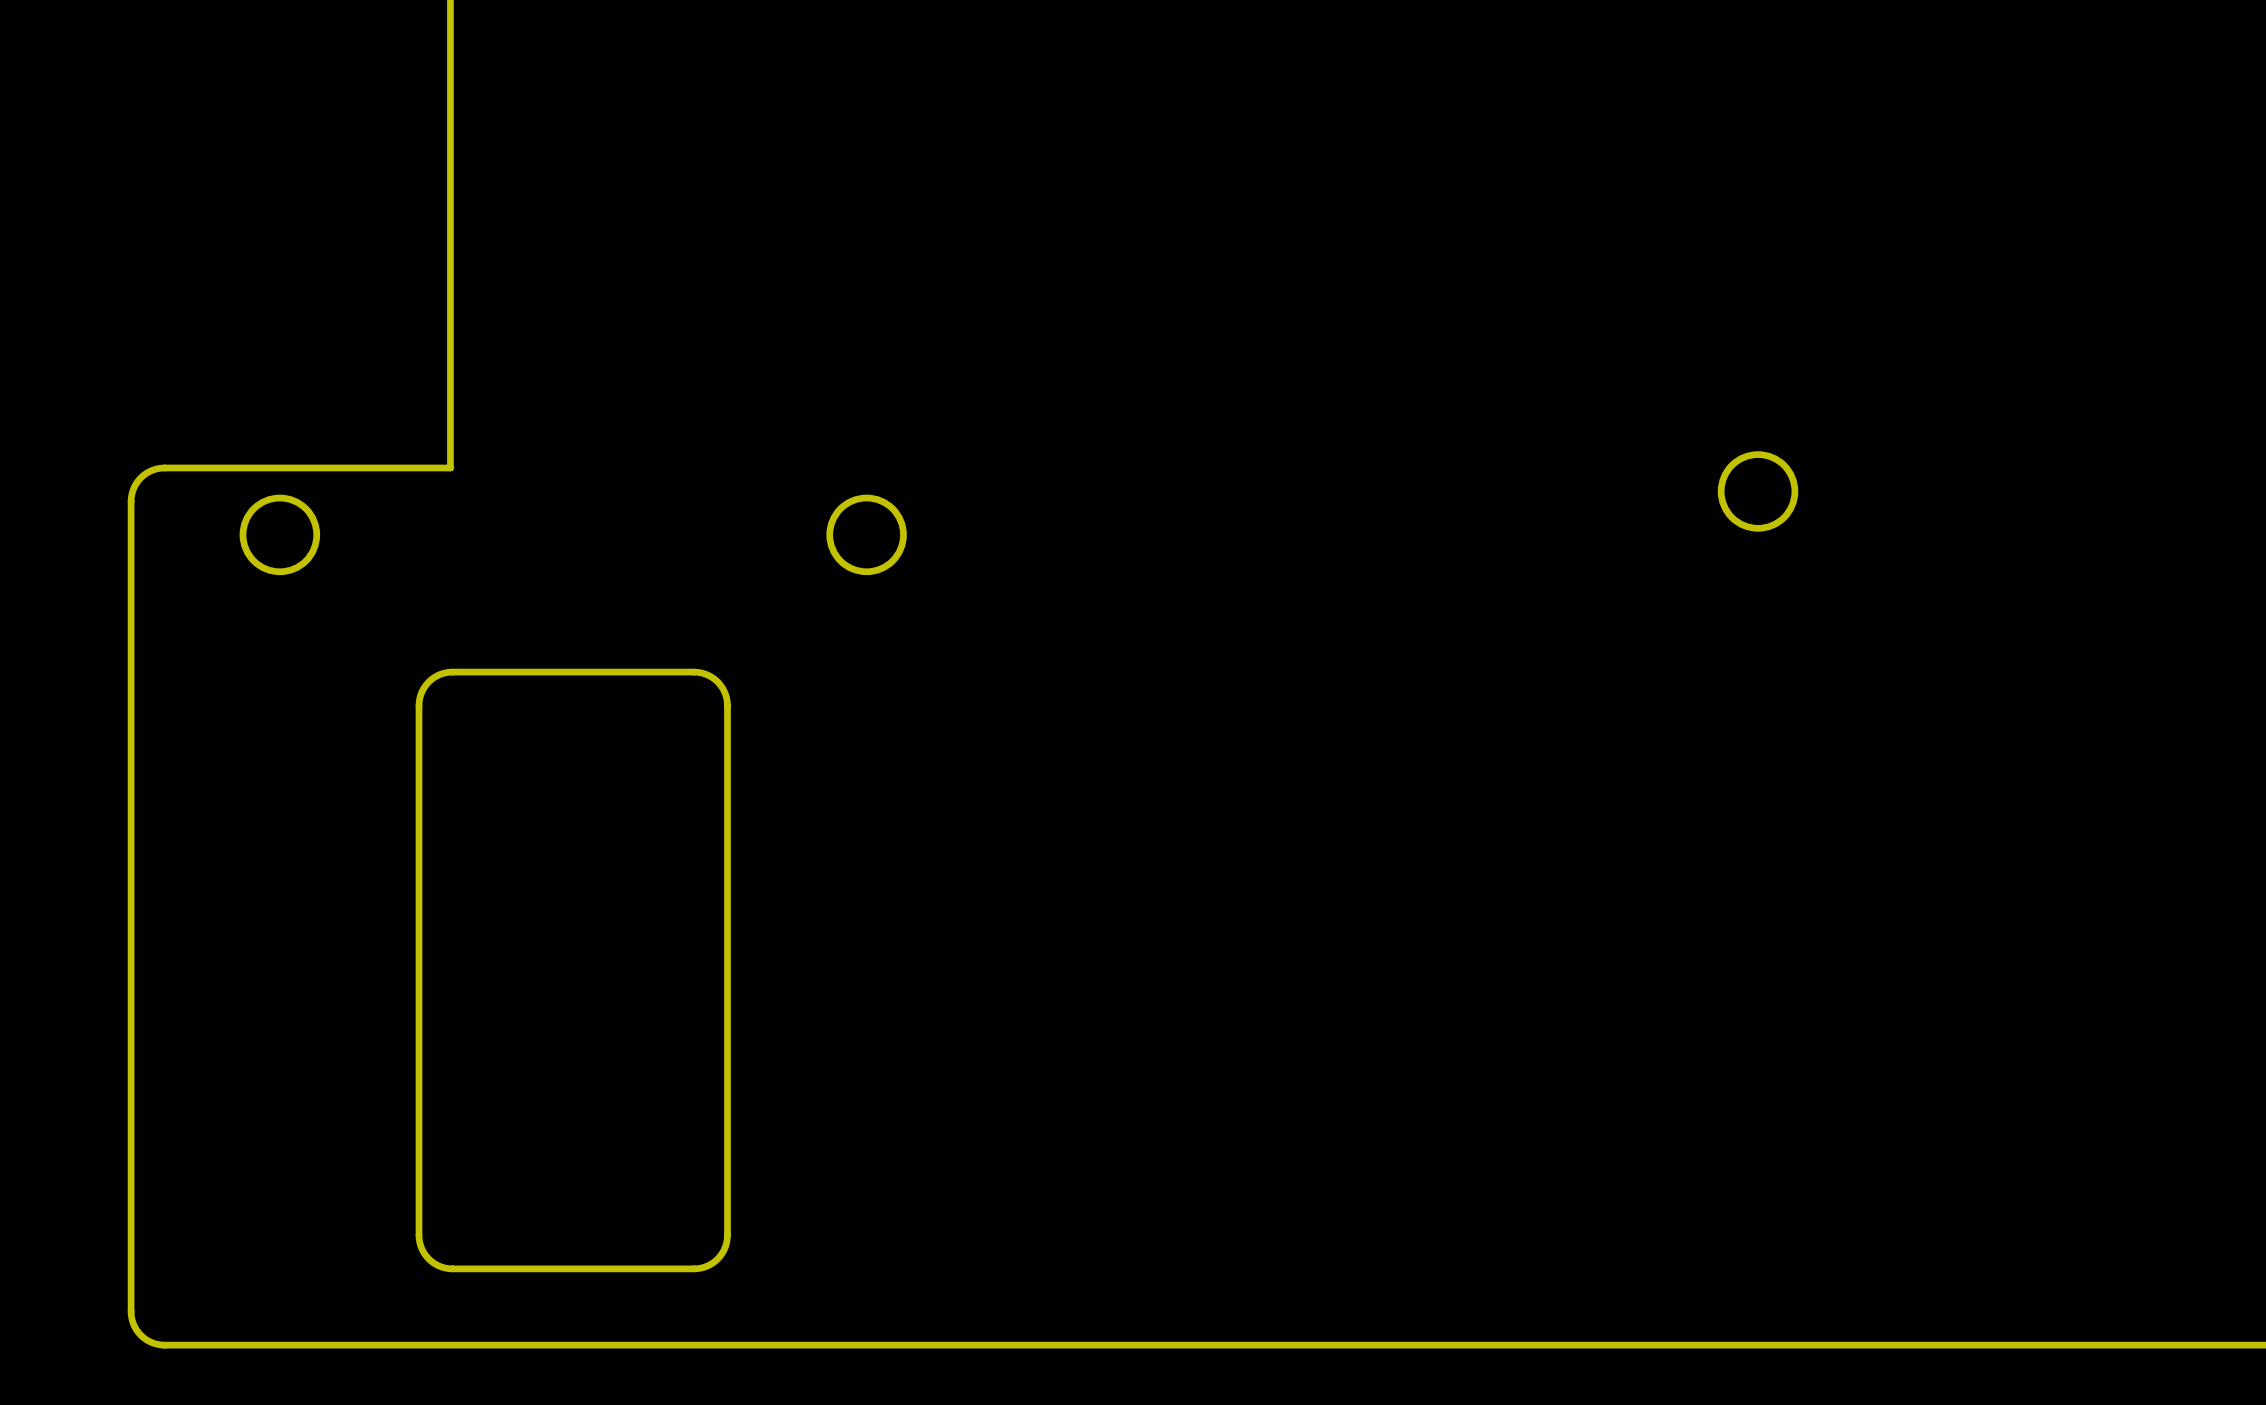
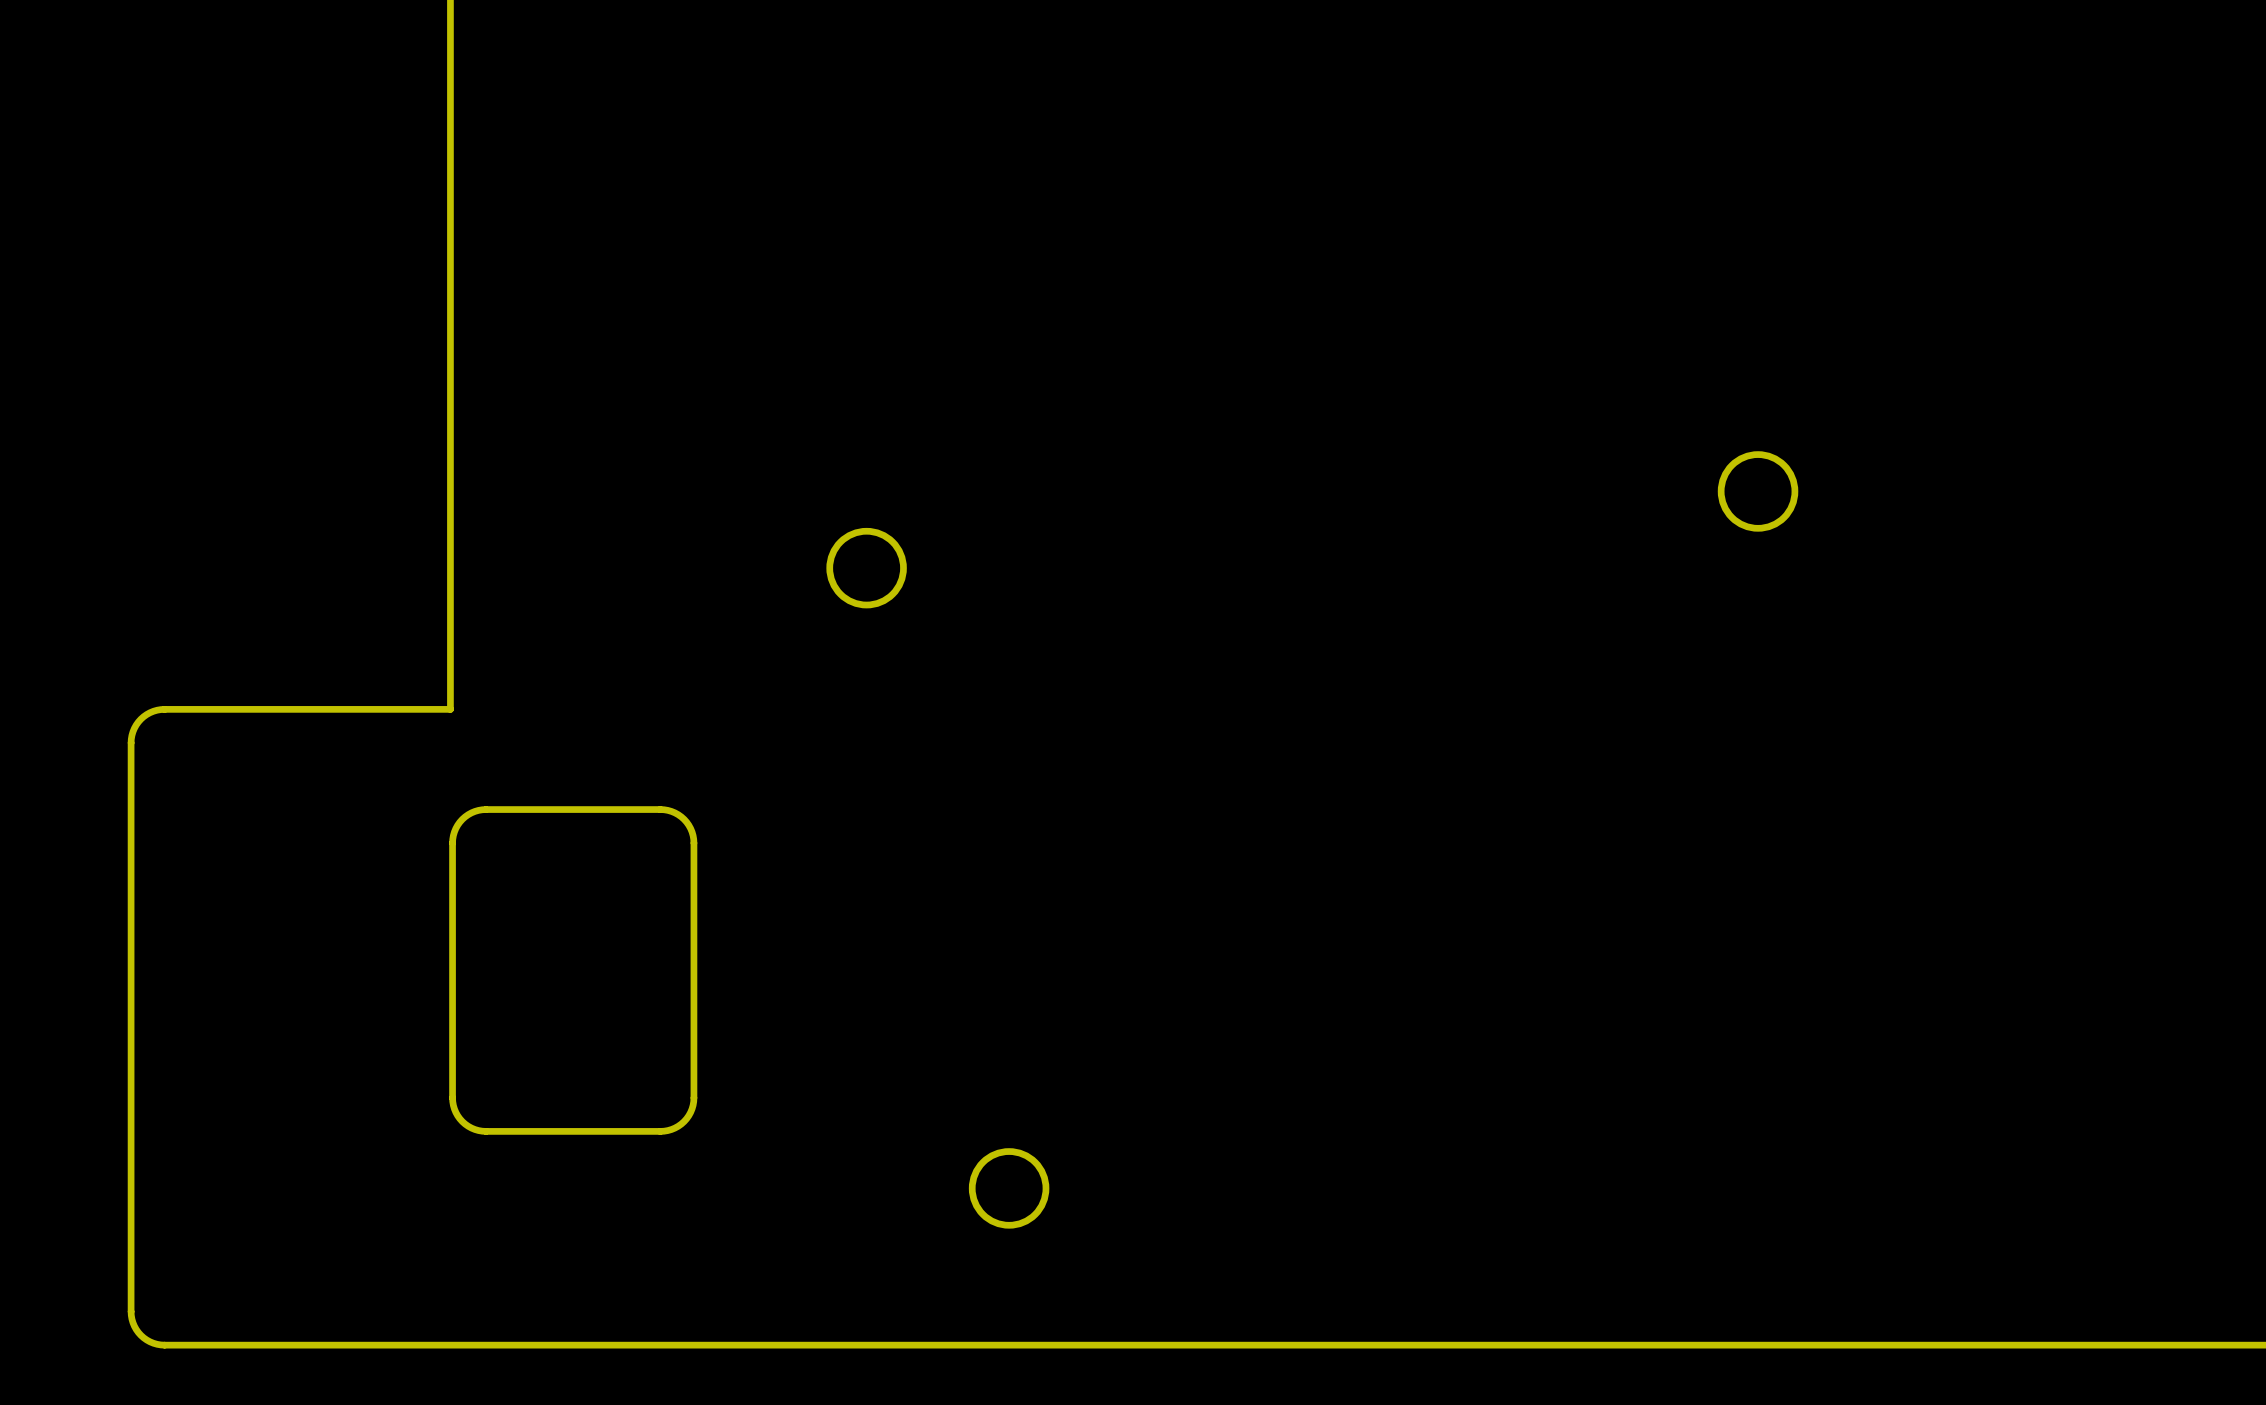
board edge: (450, 467) (164, 467) (153, 469) (143, 475) (134, 486) (131, 501) (131, 742) -> (450, 467) (450, 709) (160, 709) (150, 712) (138, 722) (132, 731) (131, 742)
round board edge: [239, 494, 321, 576] -> none
round board edge position: (866, 534) -> (866, 568)
board edge: (452, 672) (697, 672) (711, 677) (724, 691) (727, 705) (727, 1235) (722, 1253) (708, 1265) (693, 1268) (452, 1268) (434, 1263) (422, 1249) (419, 1235) (419, 705) (420, 694) (428, 681) (441, 673) (452, 672) -> none
board edge: none -> (486, 809) (664, 809) (678, 814) (688, 825) (693, 843) (693, 1097) (688, 1115) (678, 1126) (660, 1131) (486, 1131) (468, 1126) (457, 1115) (452, 1097) (452, 839) (455, 828) (462, 819) (471, 812) (486, 809)
round board edge: none -> [968, 1148, 1050, 1229]

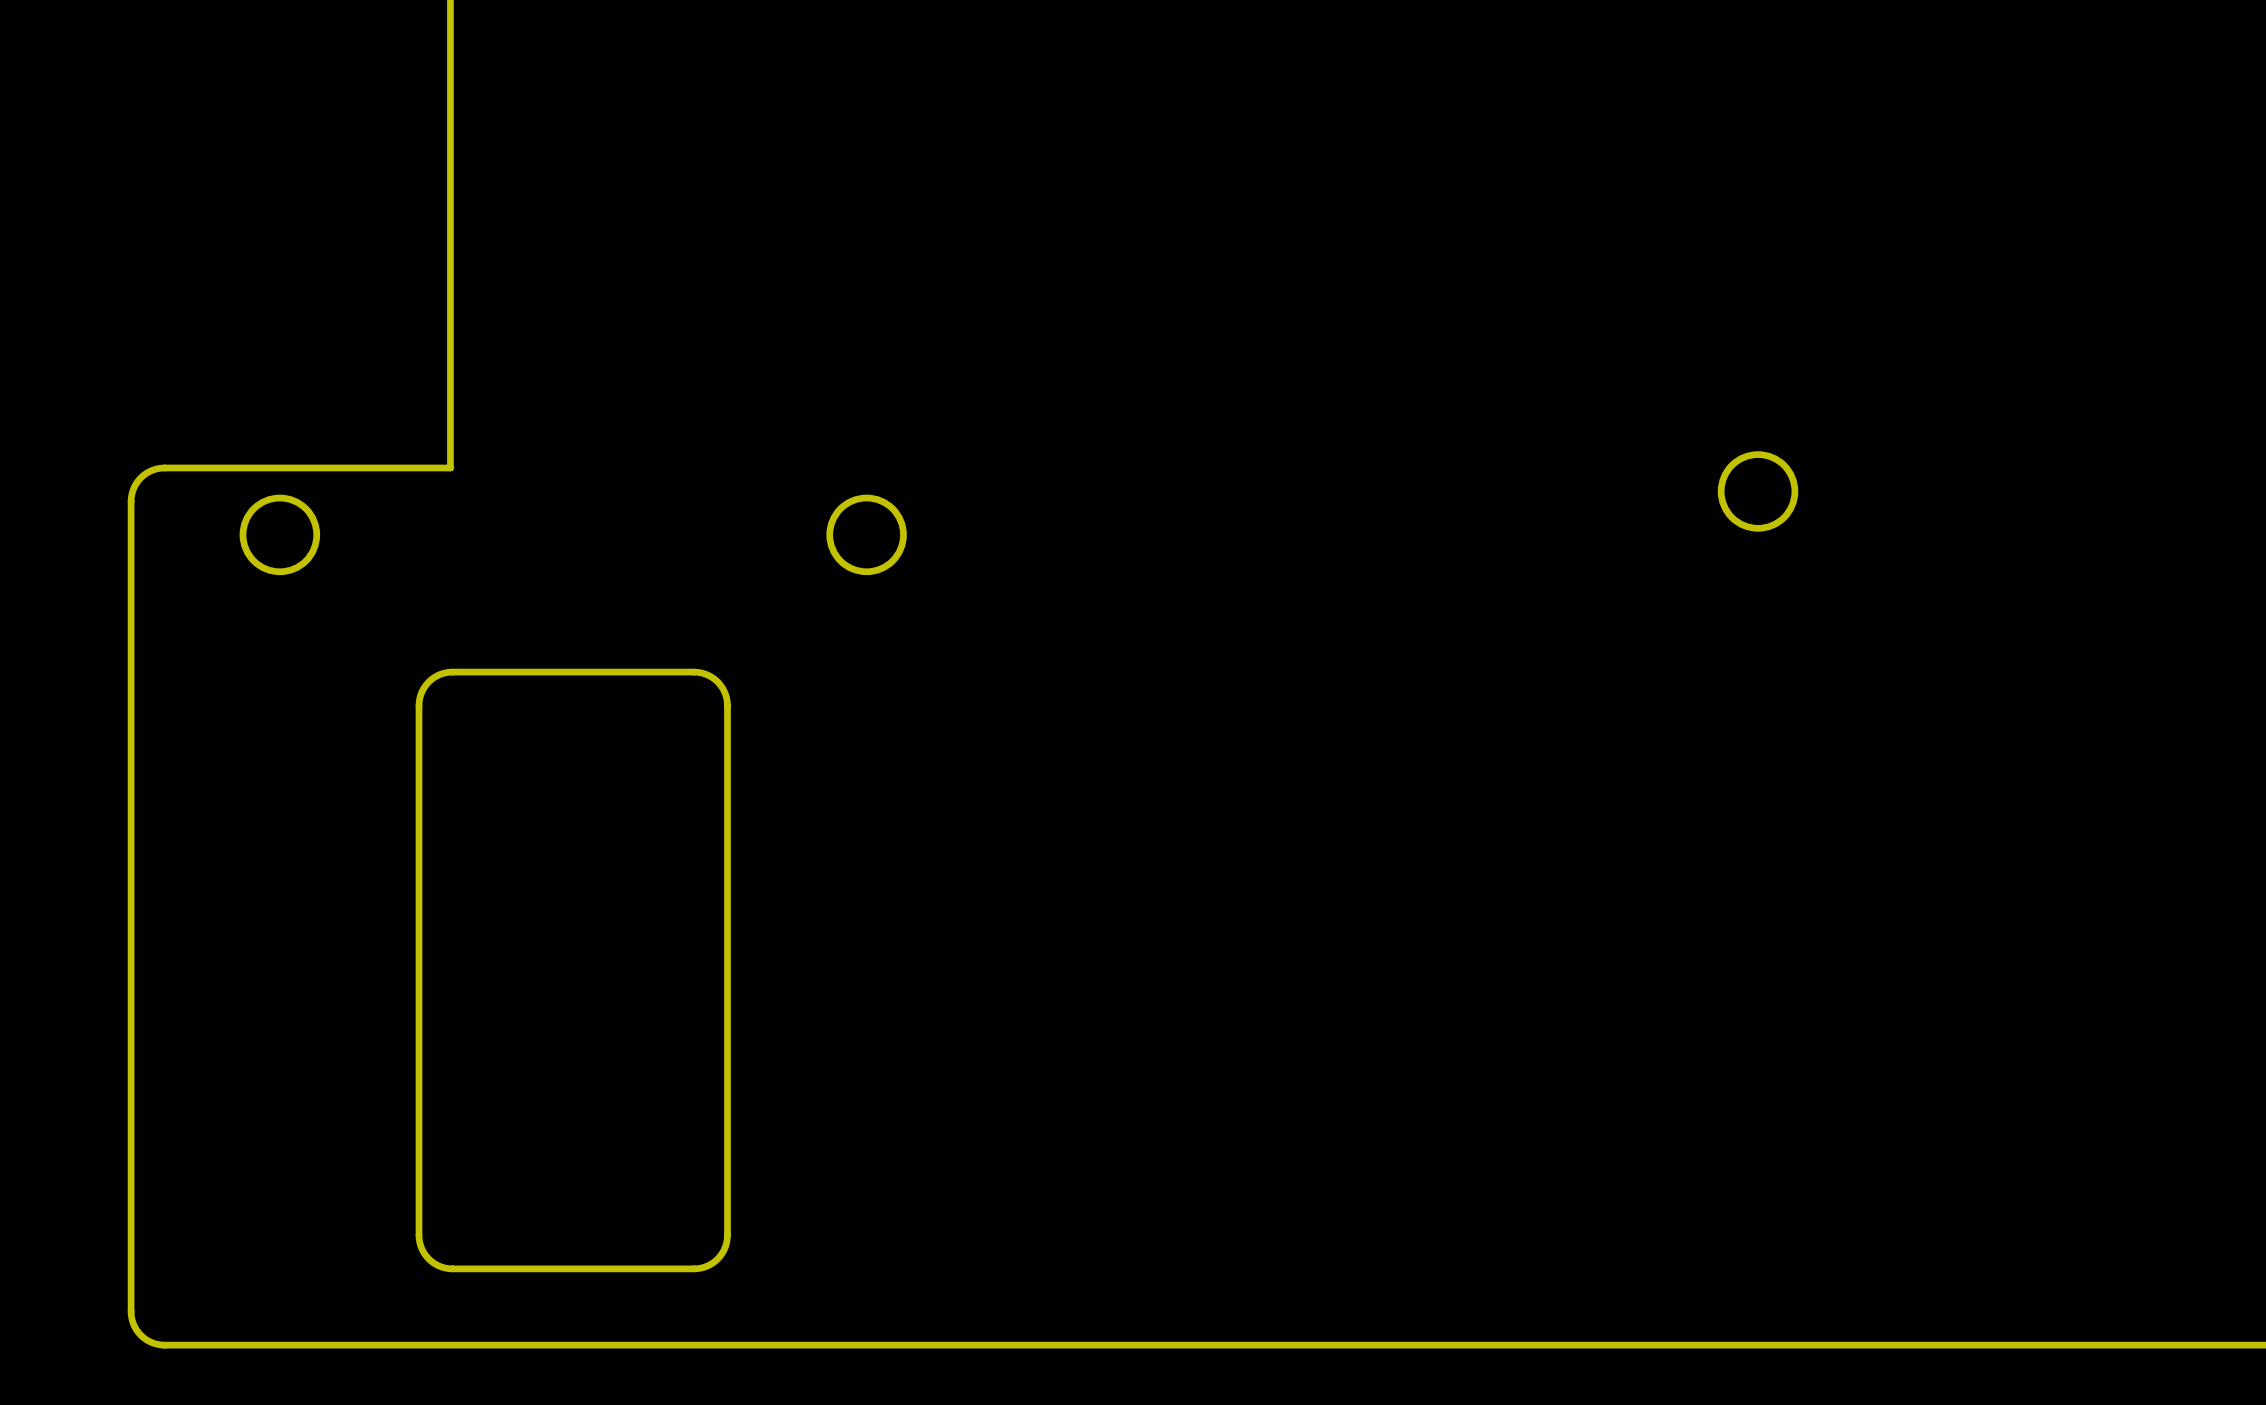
board edge: (450, 467) (450, 709) (160, 709) (150, 712) (138, 722) (132, 731) (131, 742) -> (450, 467) (164, 467) (153, 469) (143, 475) (134, 486) (131, 501) (131, 742)
round board edge: none -> [239, 494, 321, 576]
round board edge position: (866, 568) -> (866, 534)
board edge: none -> (452, 672) (697, 672) (711, 677) (724, 691) (727, 705) (727, 1235) (722, 1253) (708, 1265) (693, 1268) (452, 1268) (434, 1263) (422, 1249) (419, 1235) (419, 705) (420, 694) (428, 681) (441, 673) (452, 672)
board edge: (486, 809) (664, 809) (678, 814) (688, 825) (693, 843) (693, 1097) (688, 1115) (678, 1126) (660, 1131) (486, 1131) (468, 1126) (457, 1115) (452, 1097) (452, 839) (455, 828) (462, 819) (471, 812) (486, 809) -> none
round board edge: [968, 1148, 1050, 1229] -> none

